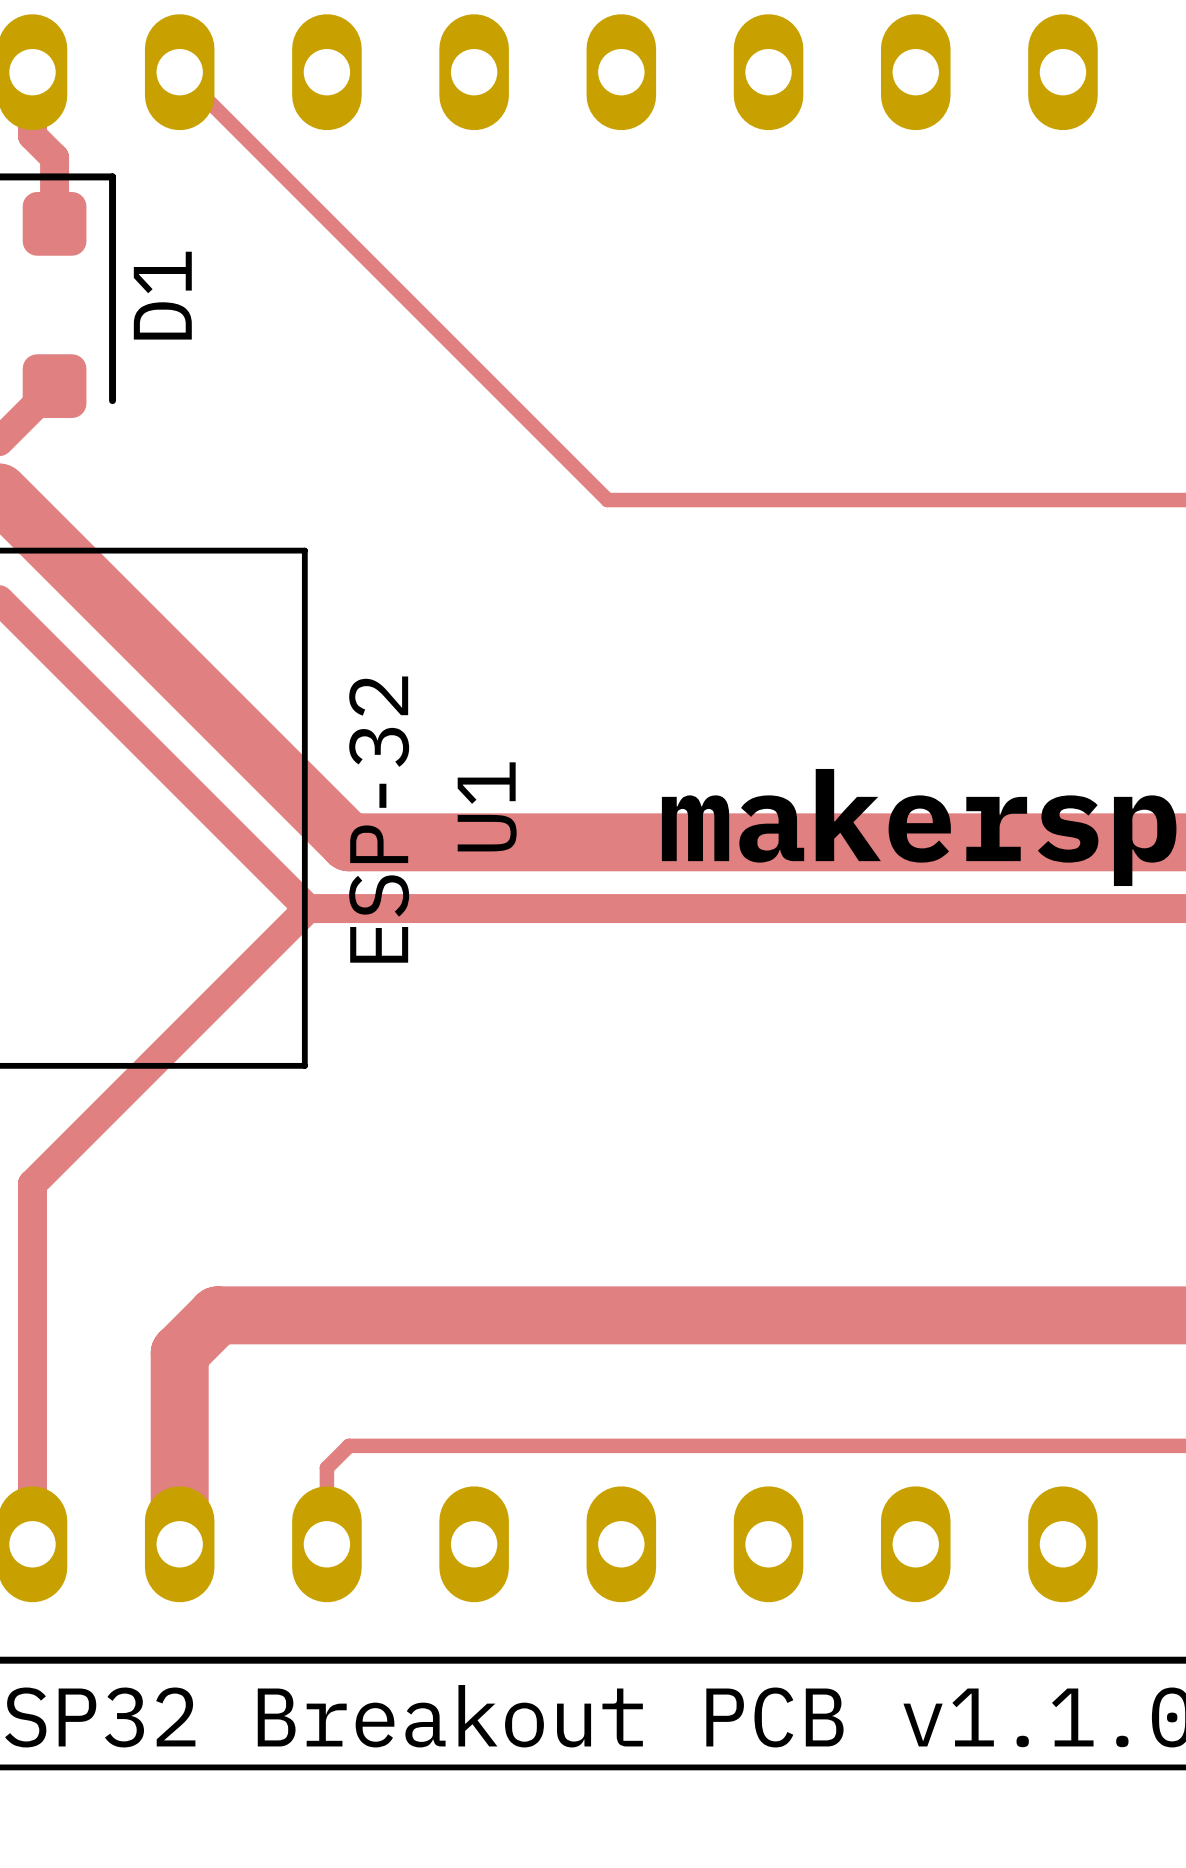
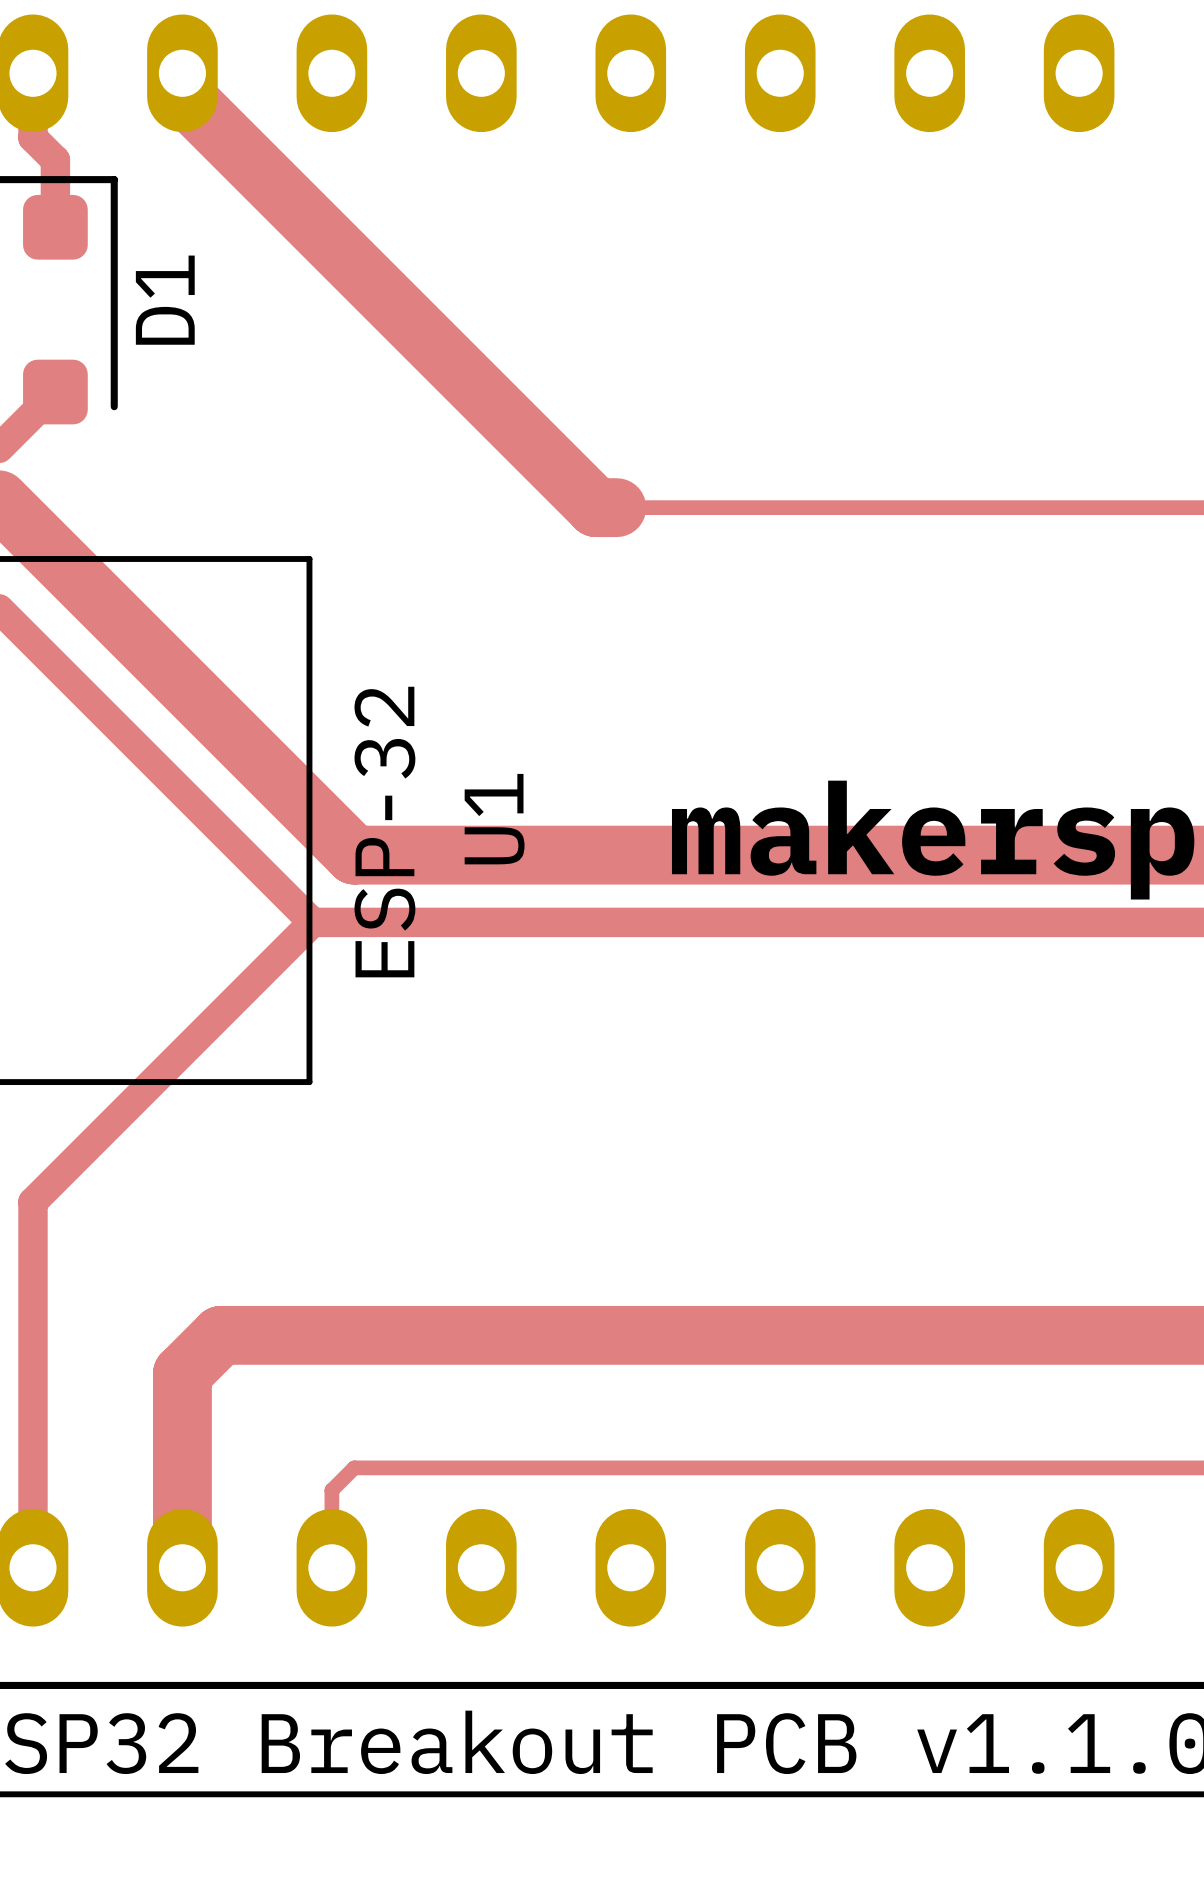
track: (179, 72) (607, 500) -> (182, 94) (596, 507) (616, 507)

